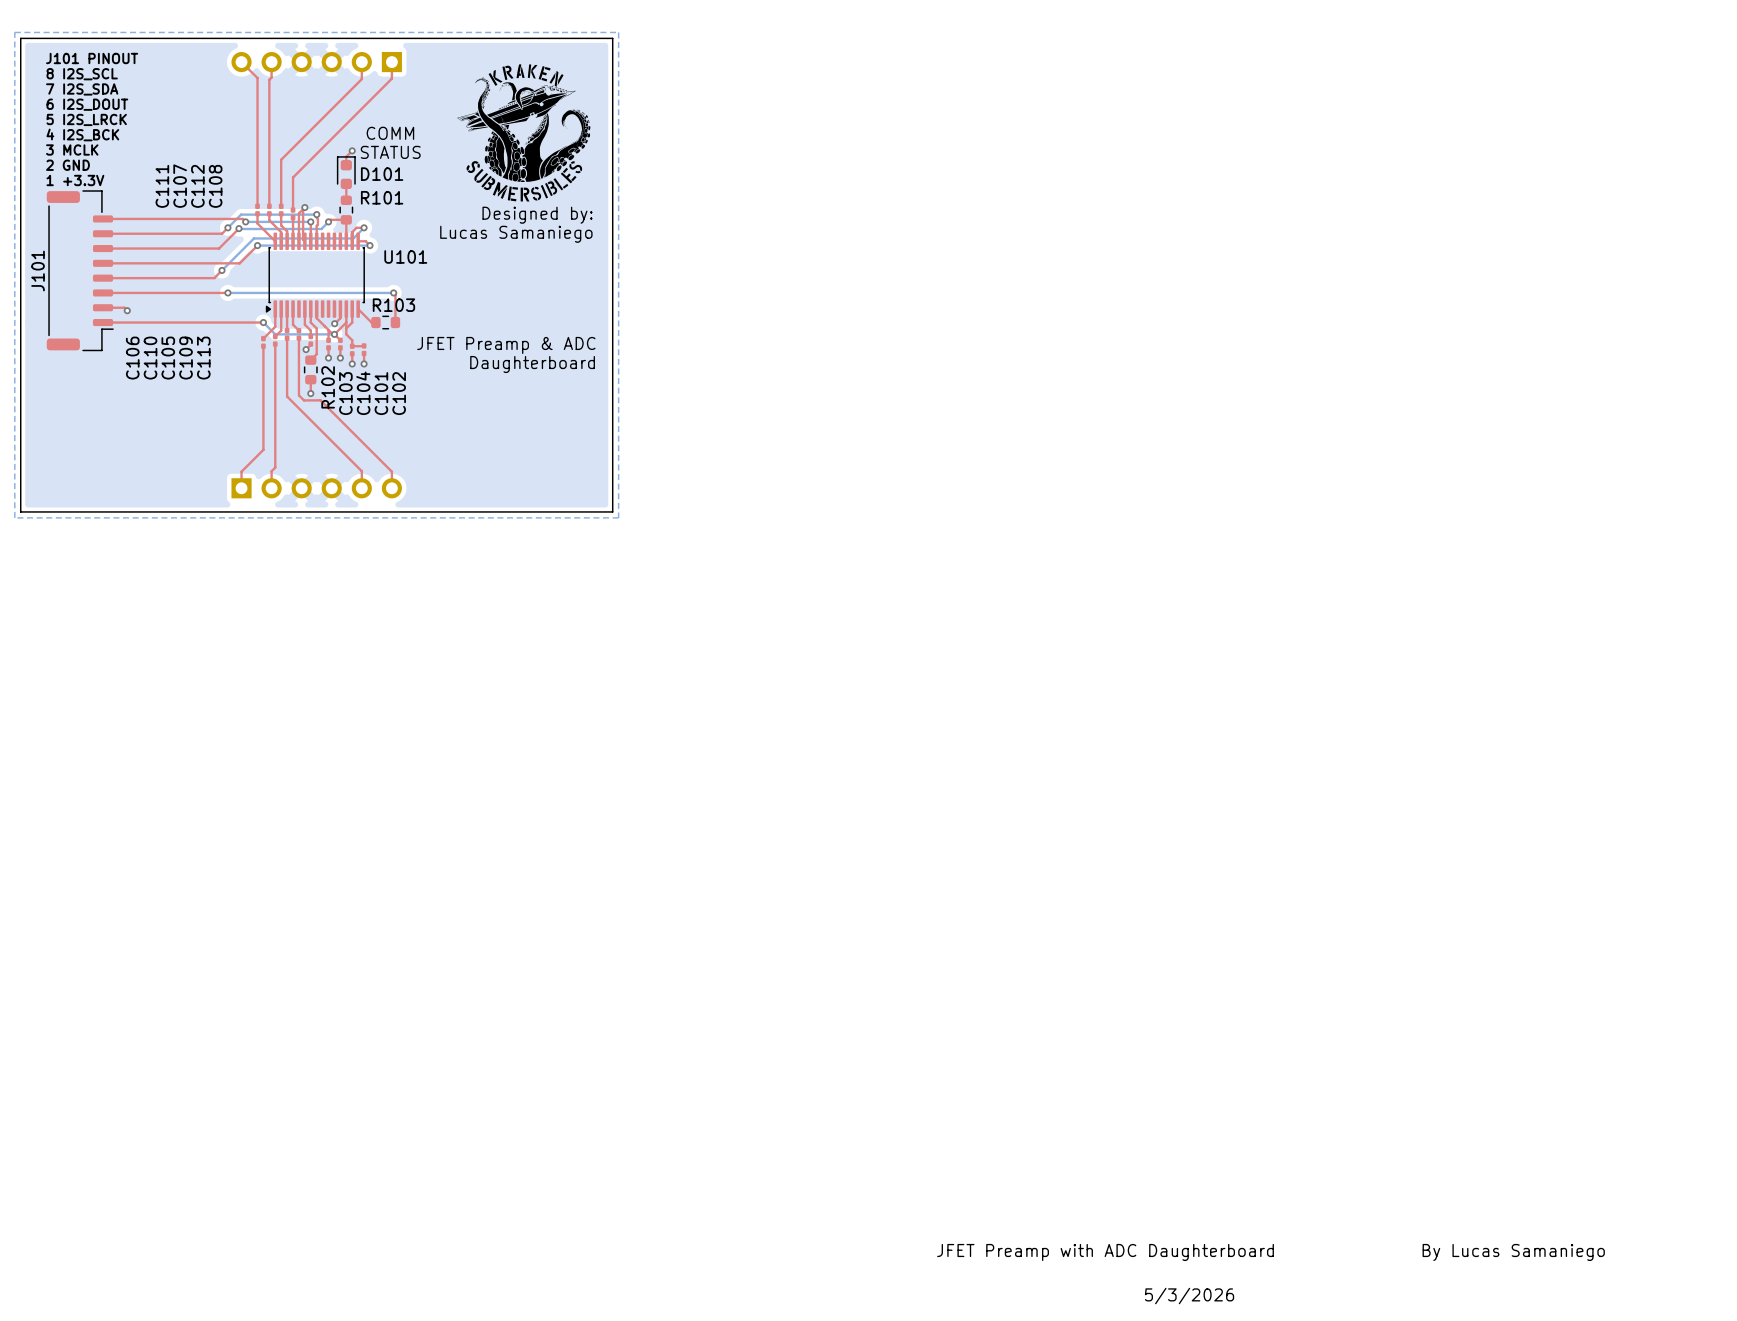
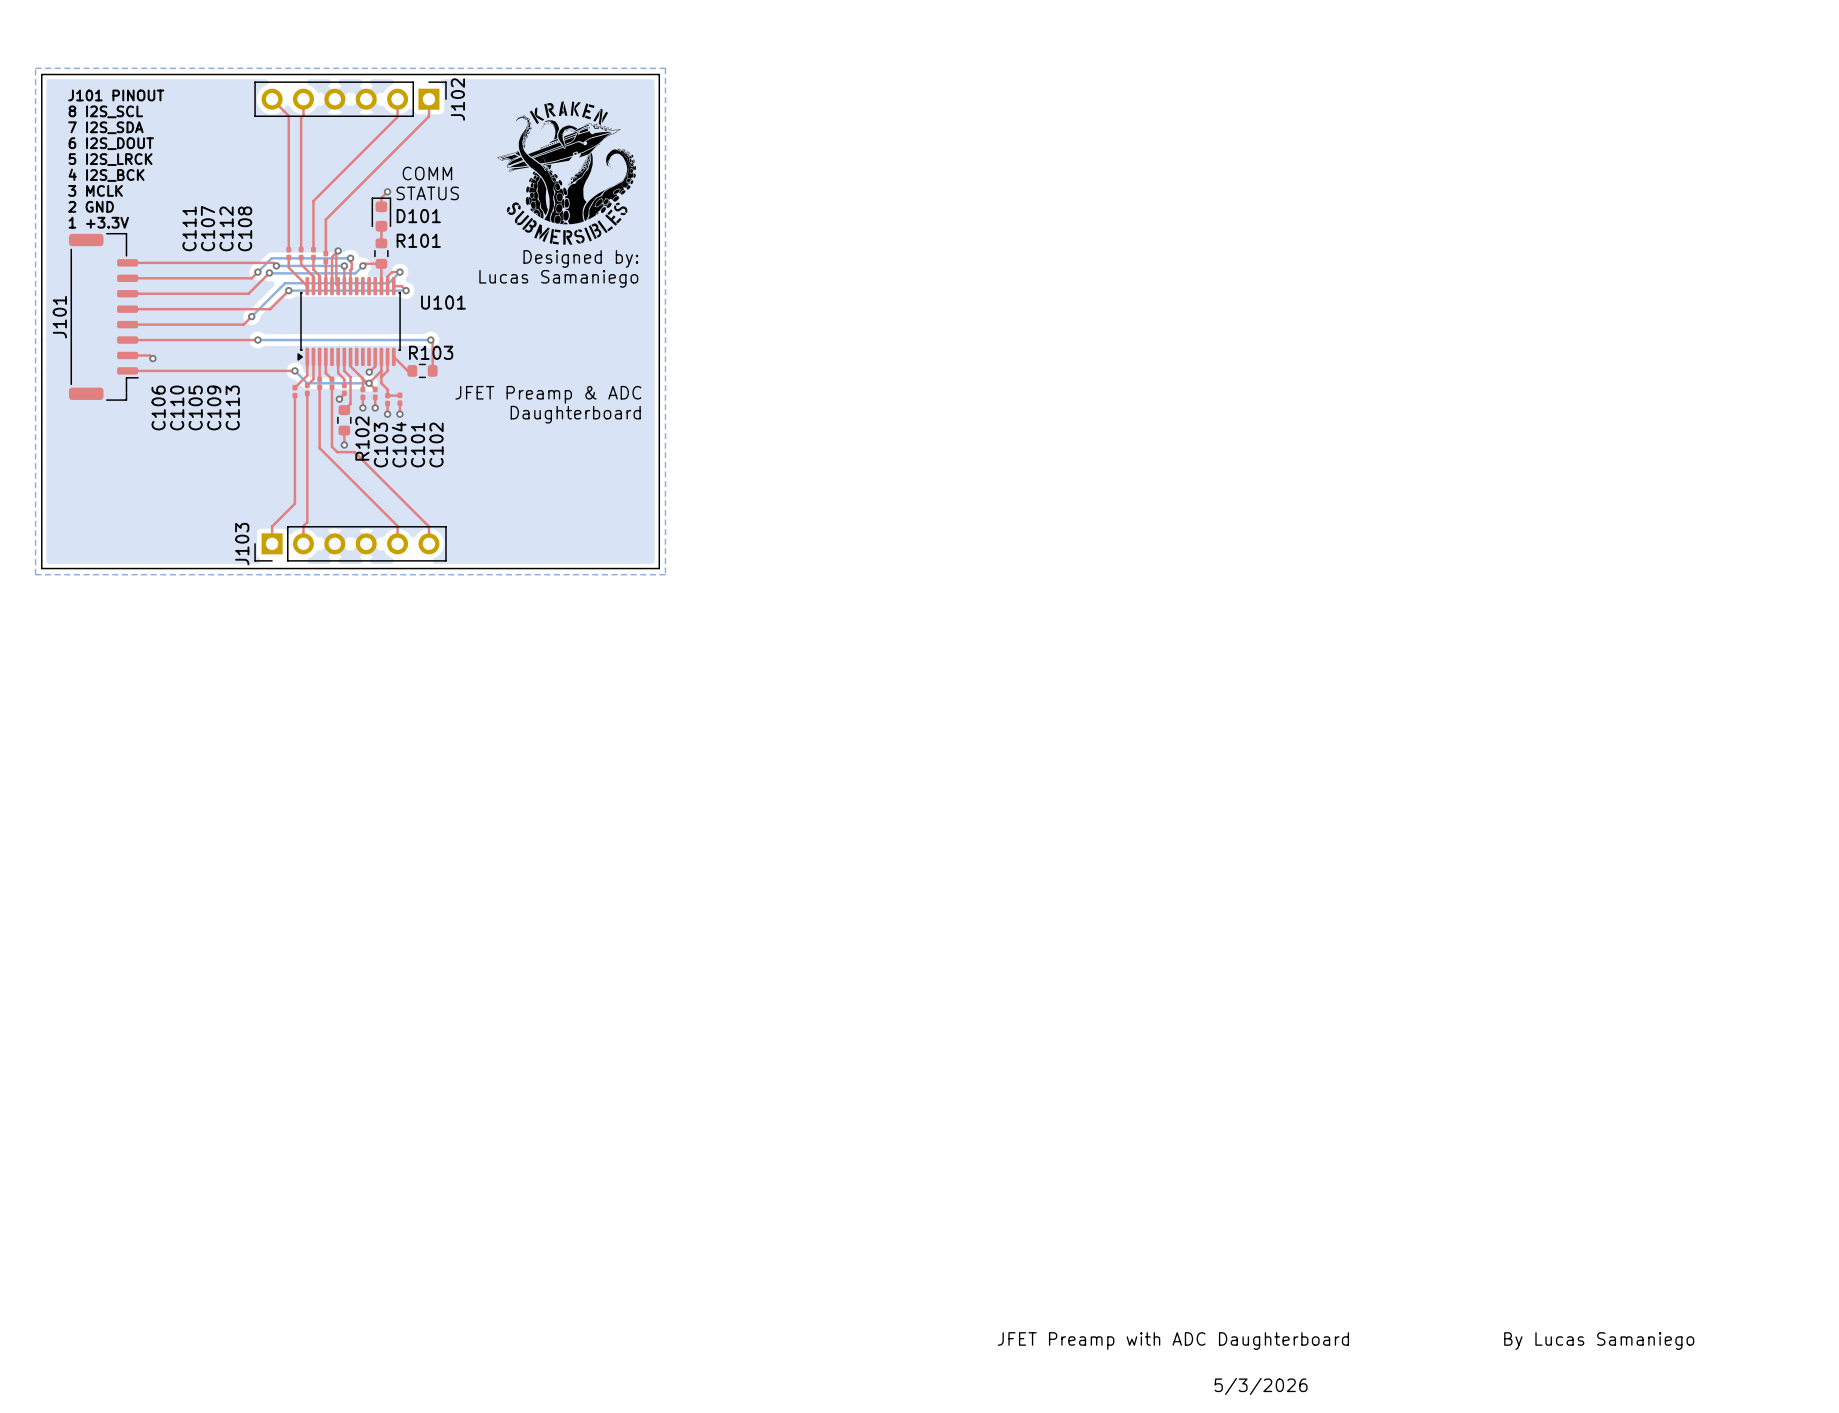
J102 side: bottom (316, 62) -> top (350, 99)
J103 side: bottom (316, 488) -> top (350, 543)

